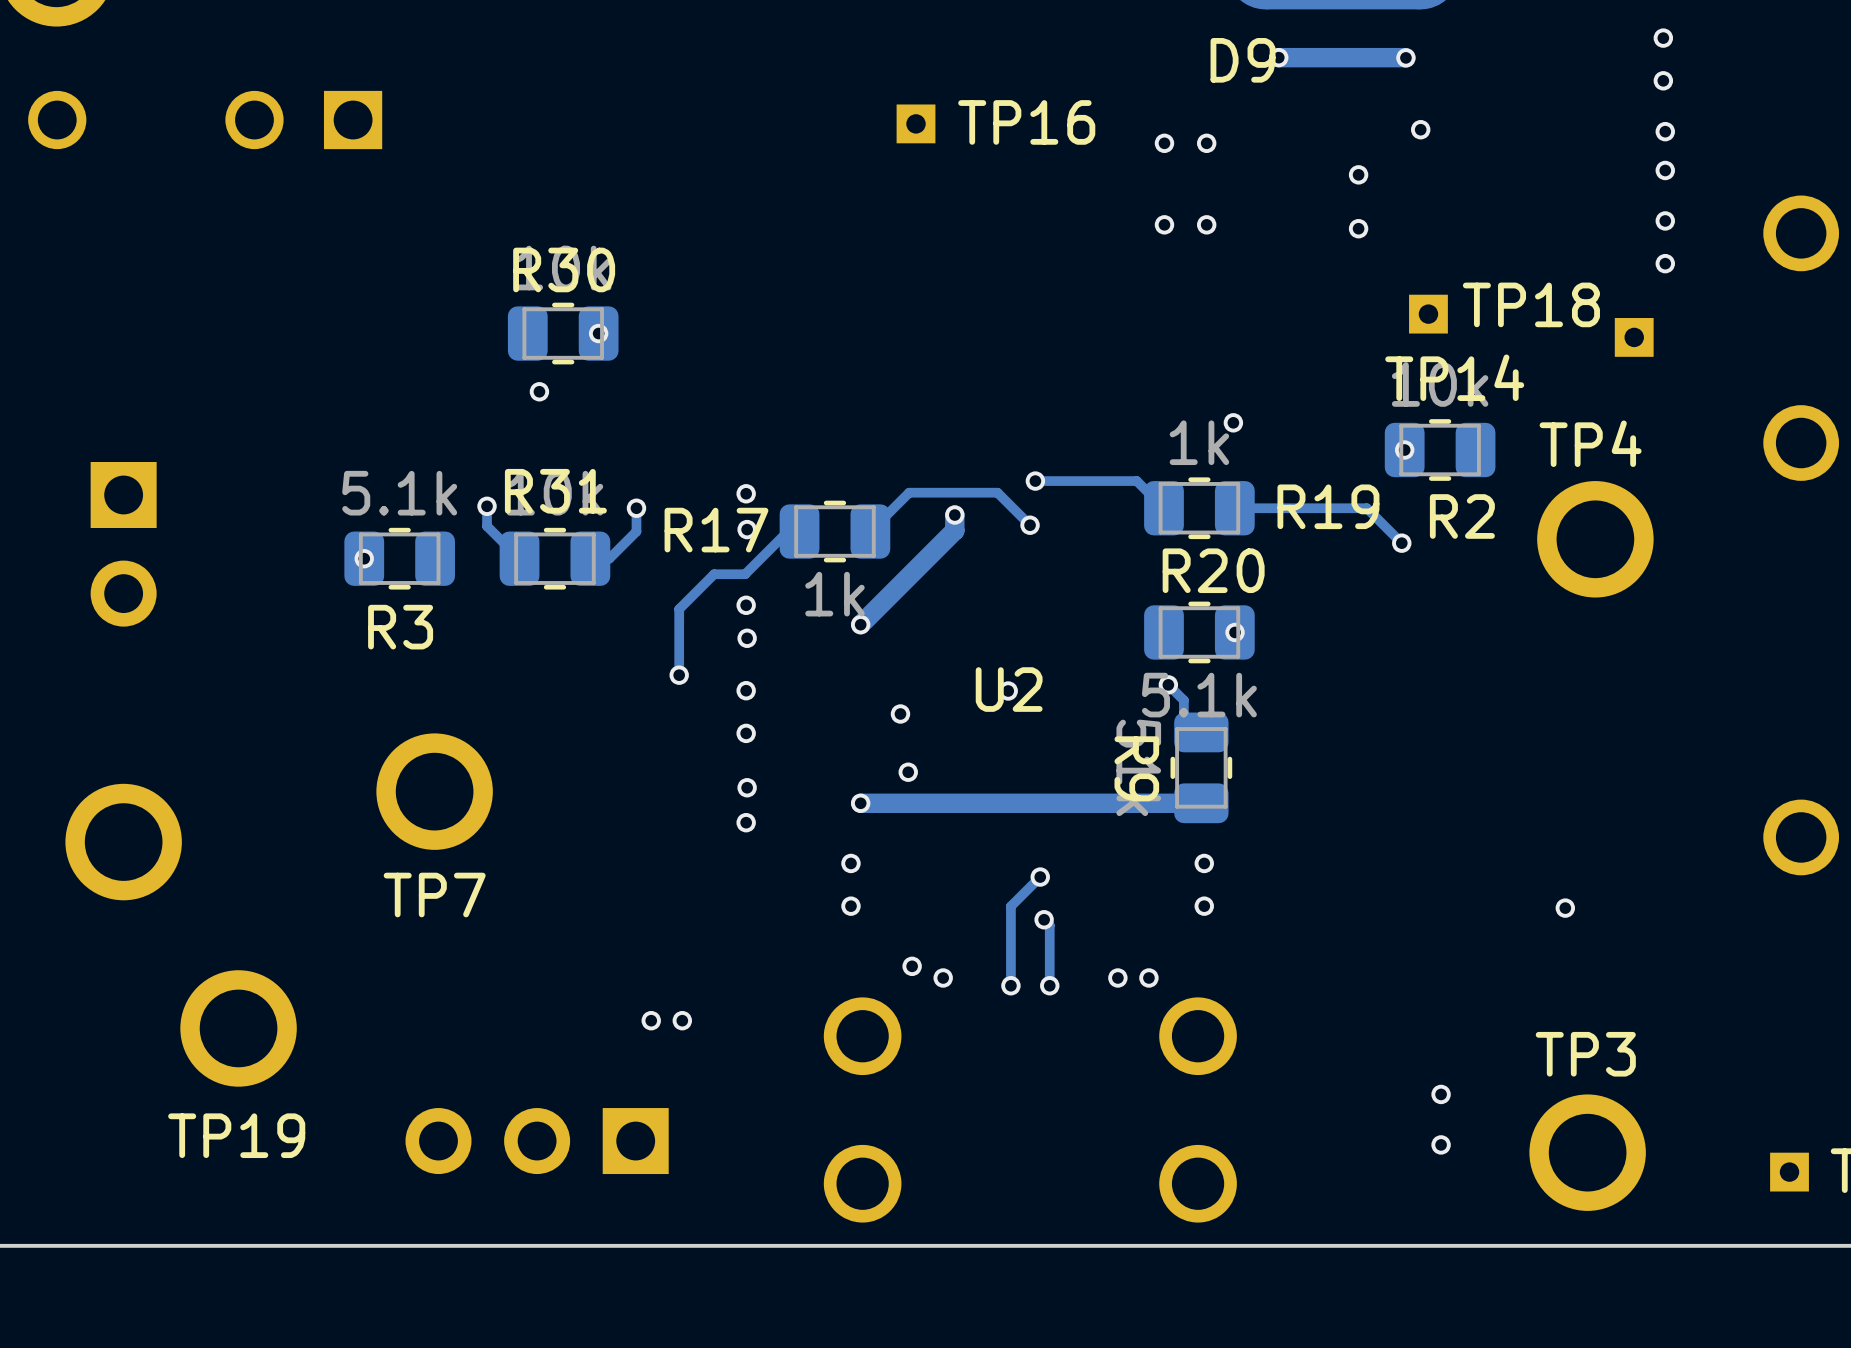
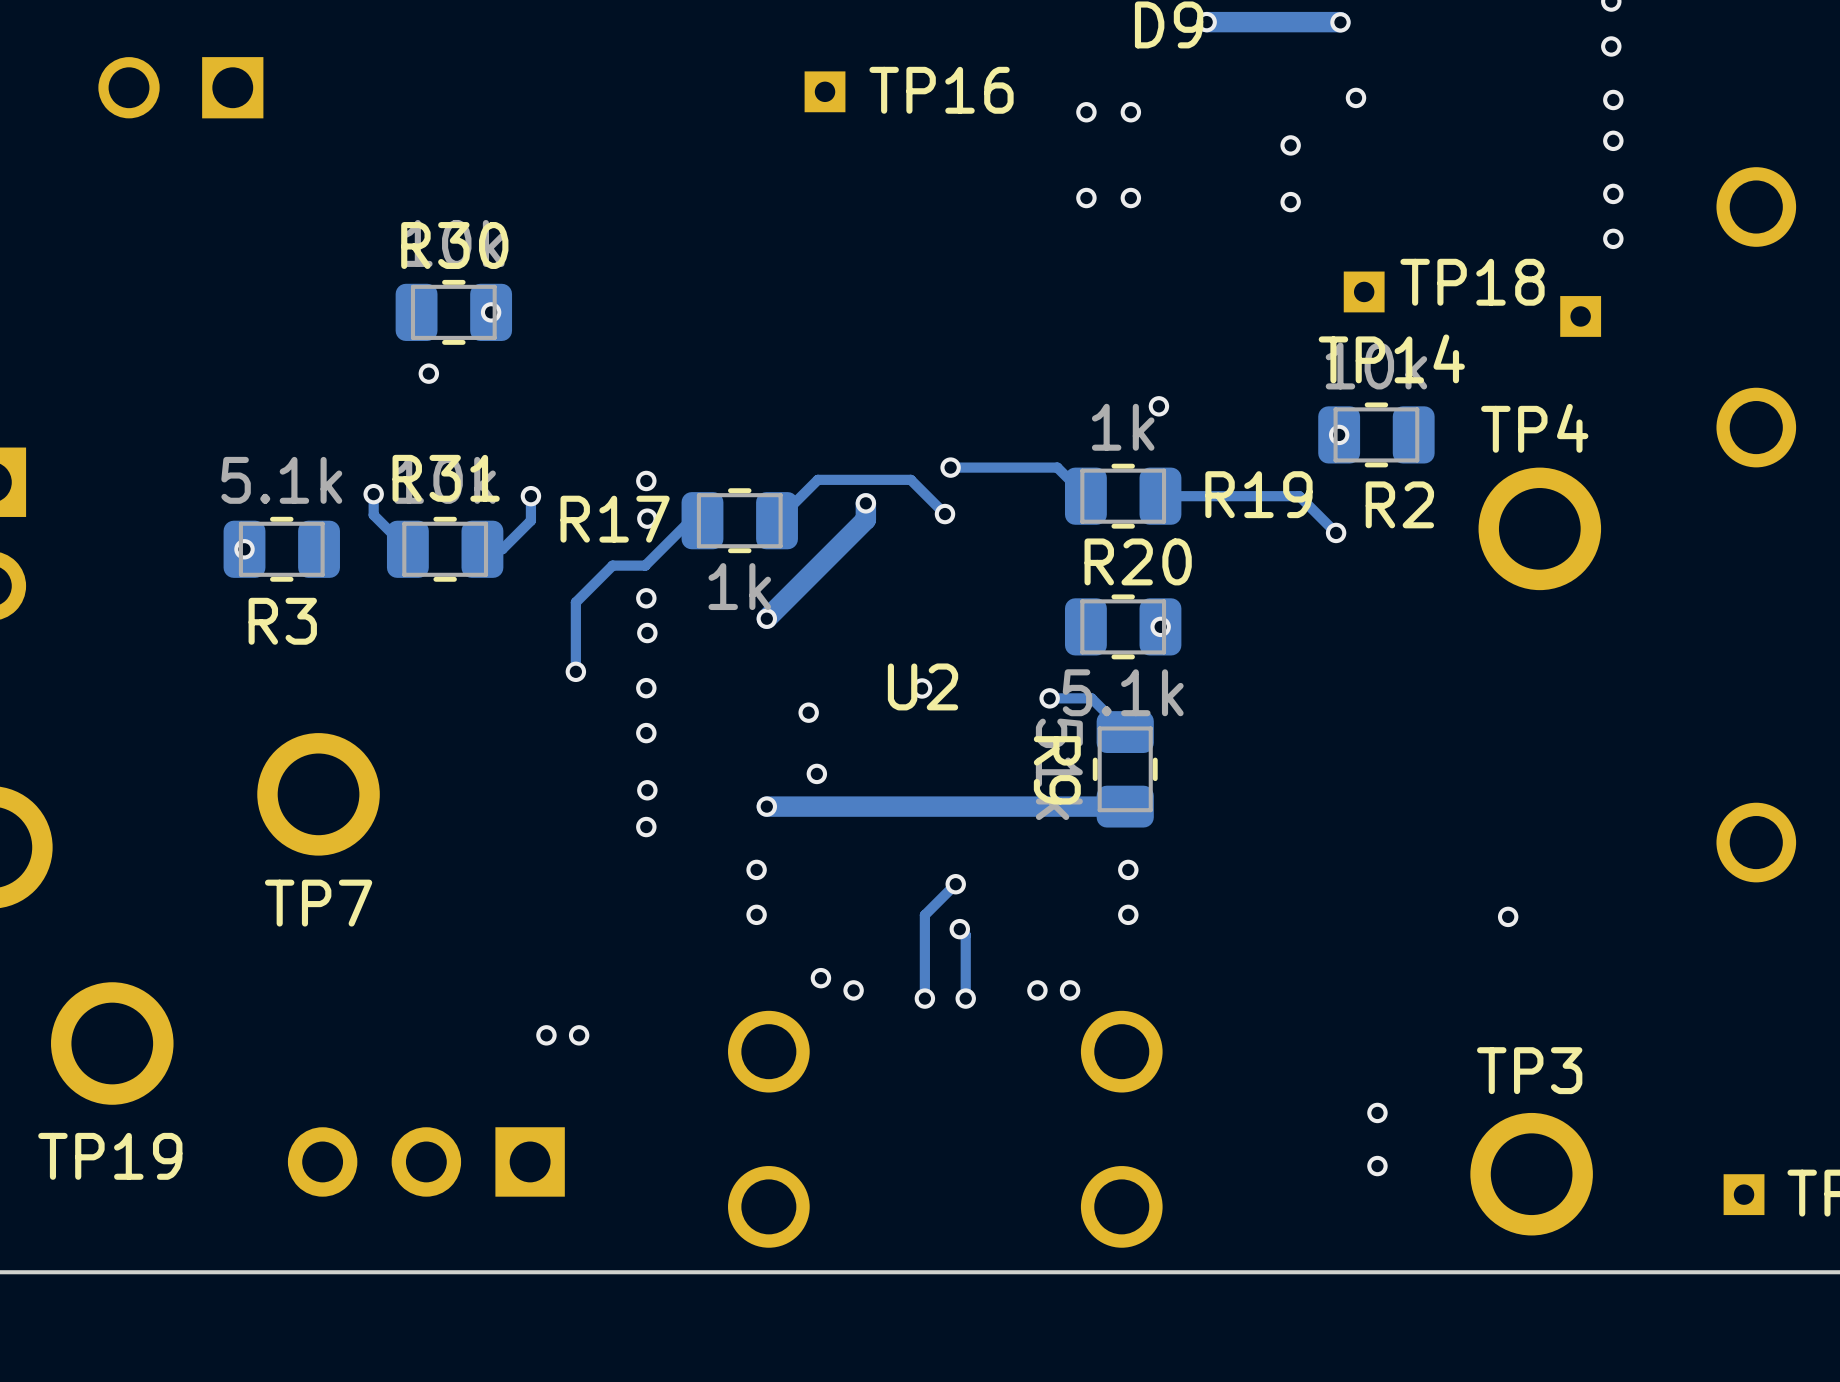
track: (1168, 684) (1183, 700) (1183, 714) -> (1049, 698) (1091, 698) (1106, 713)
via position: (1168, 684) -> (1049, 698)

